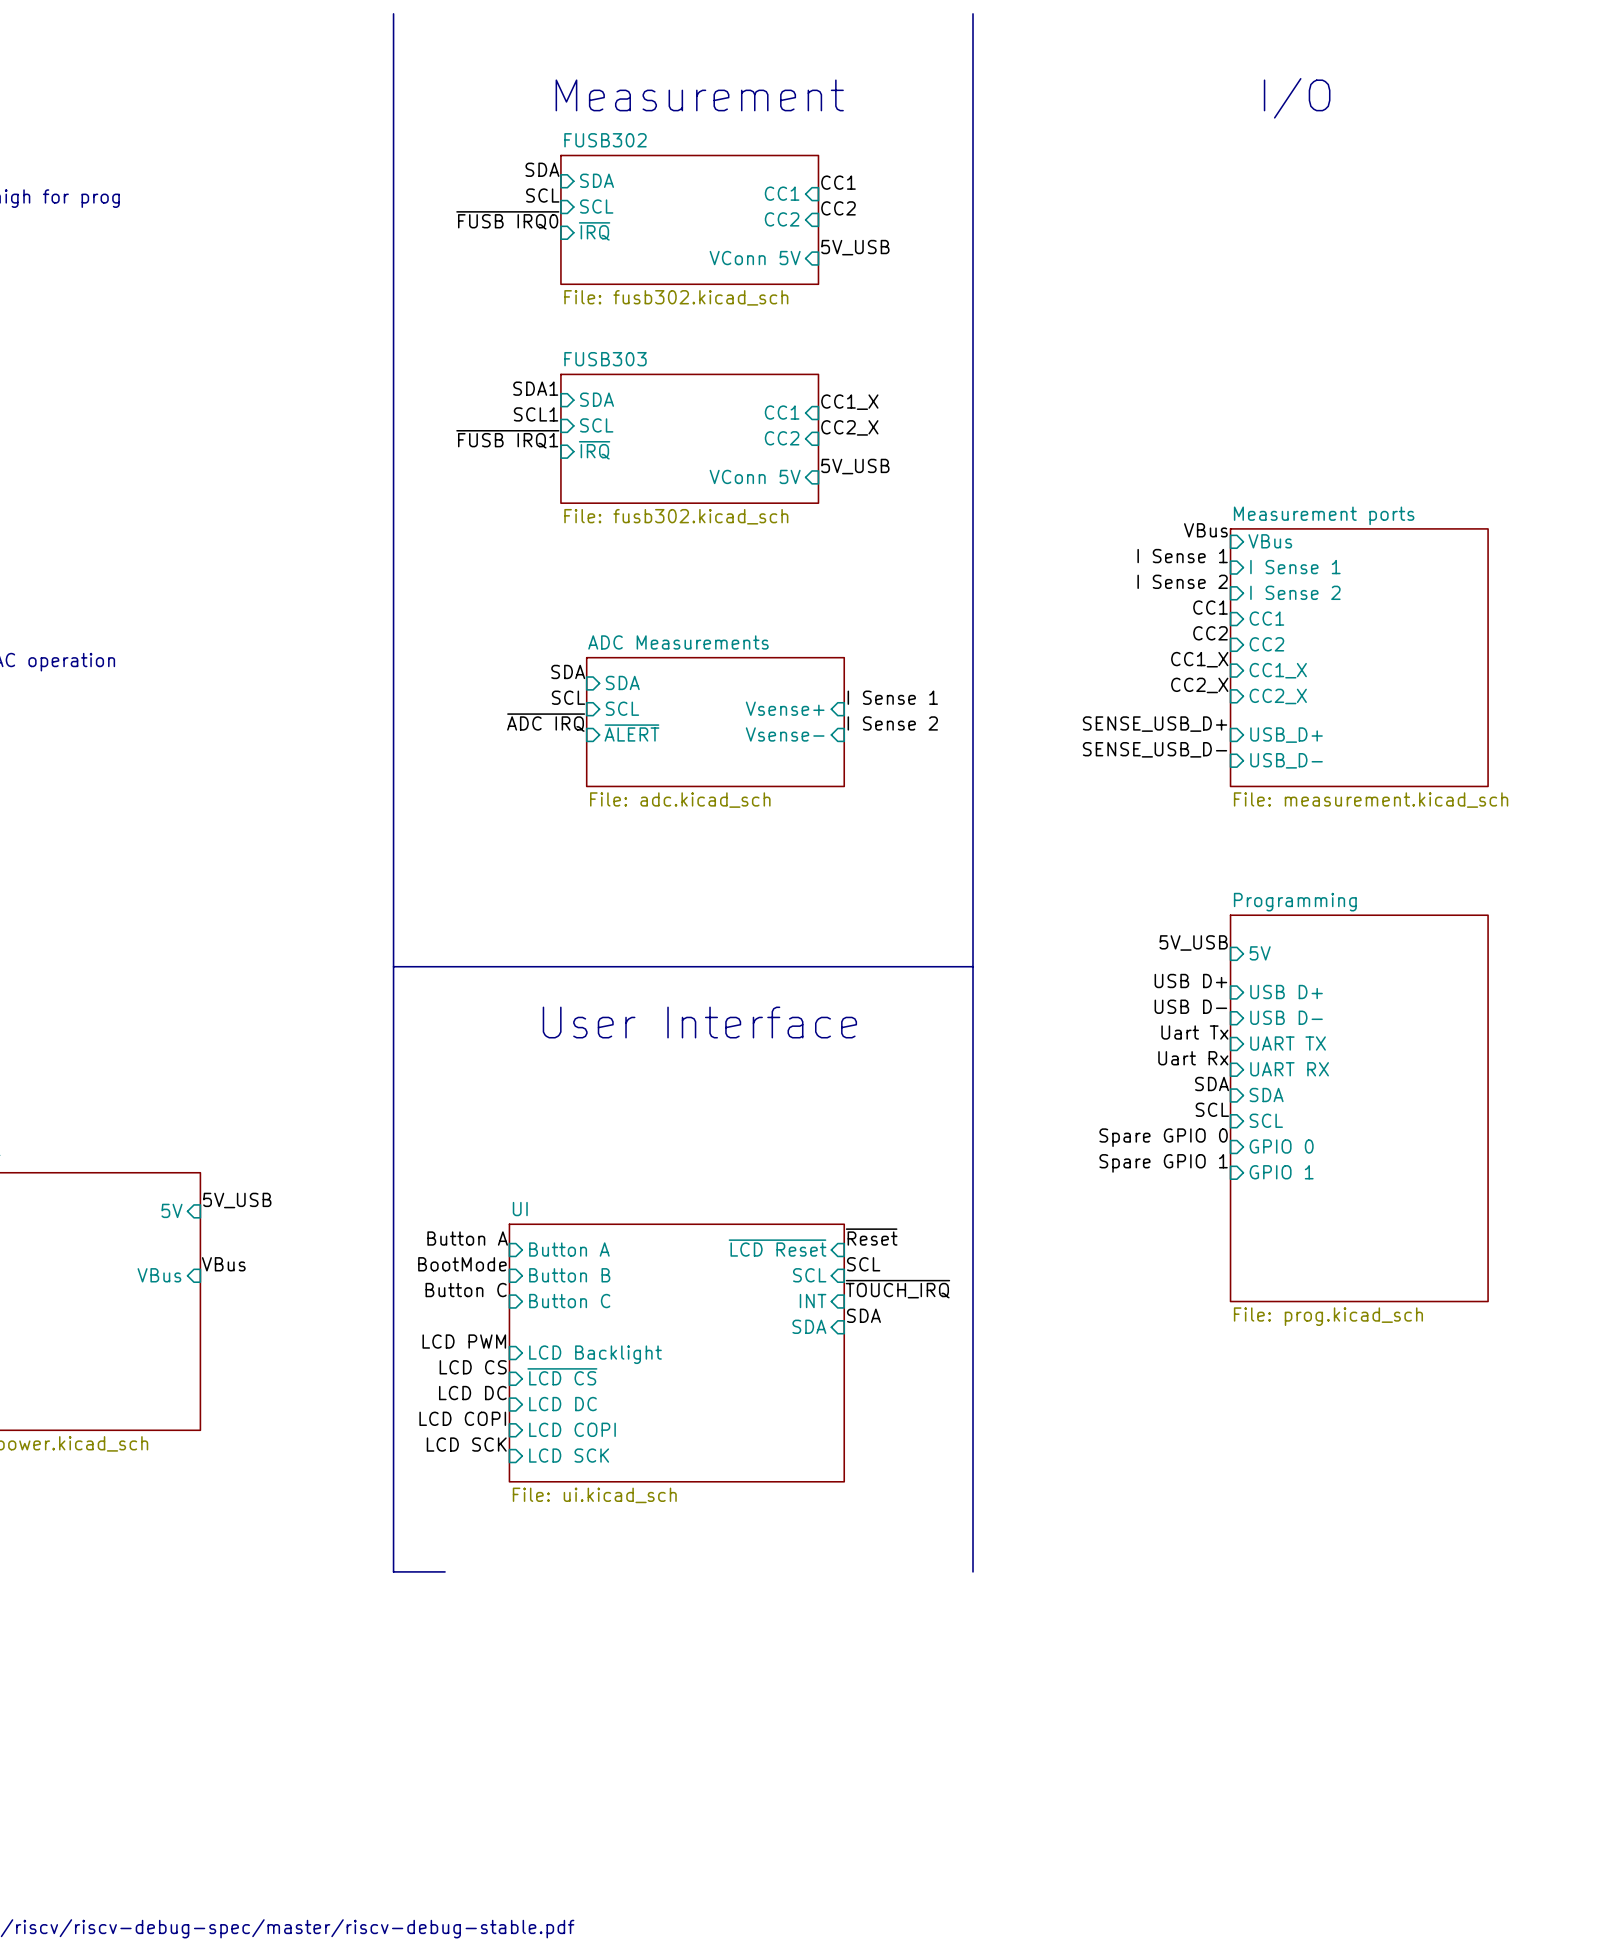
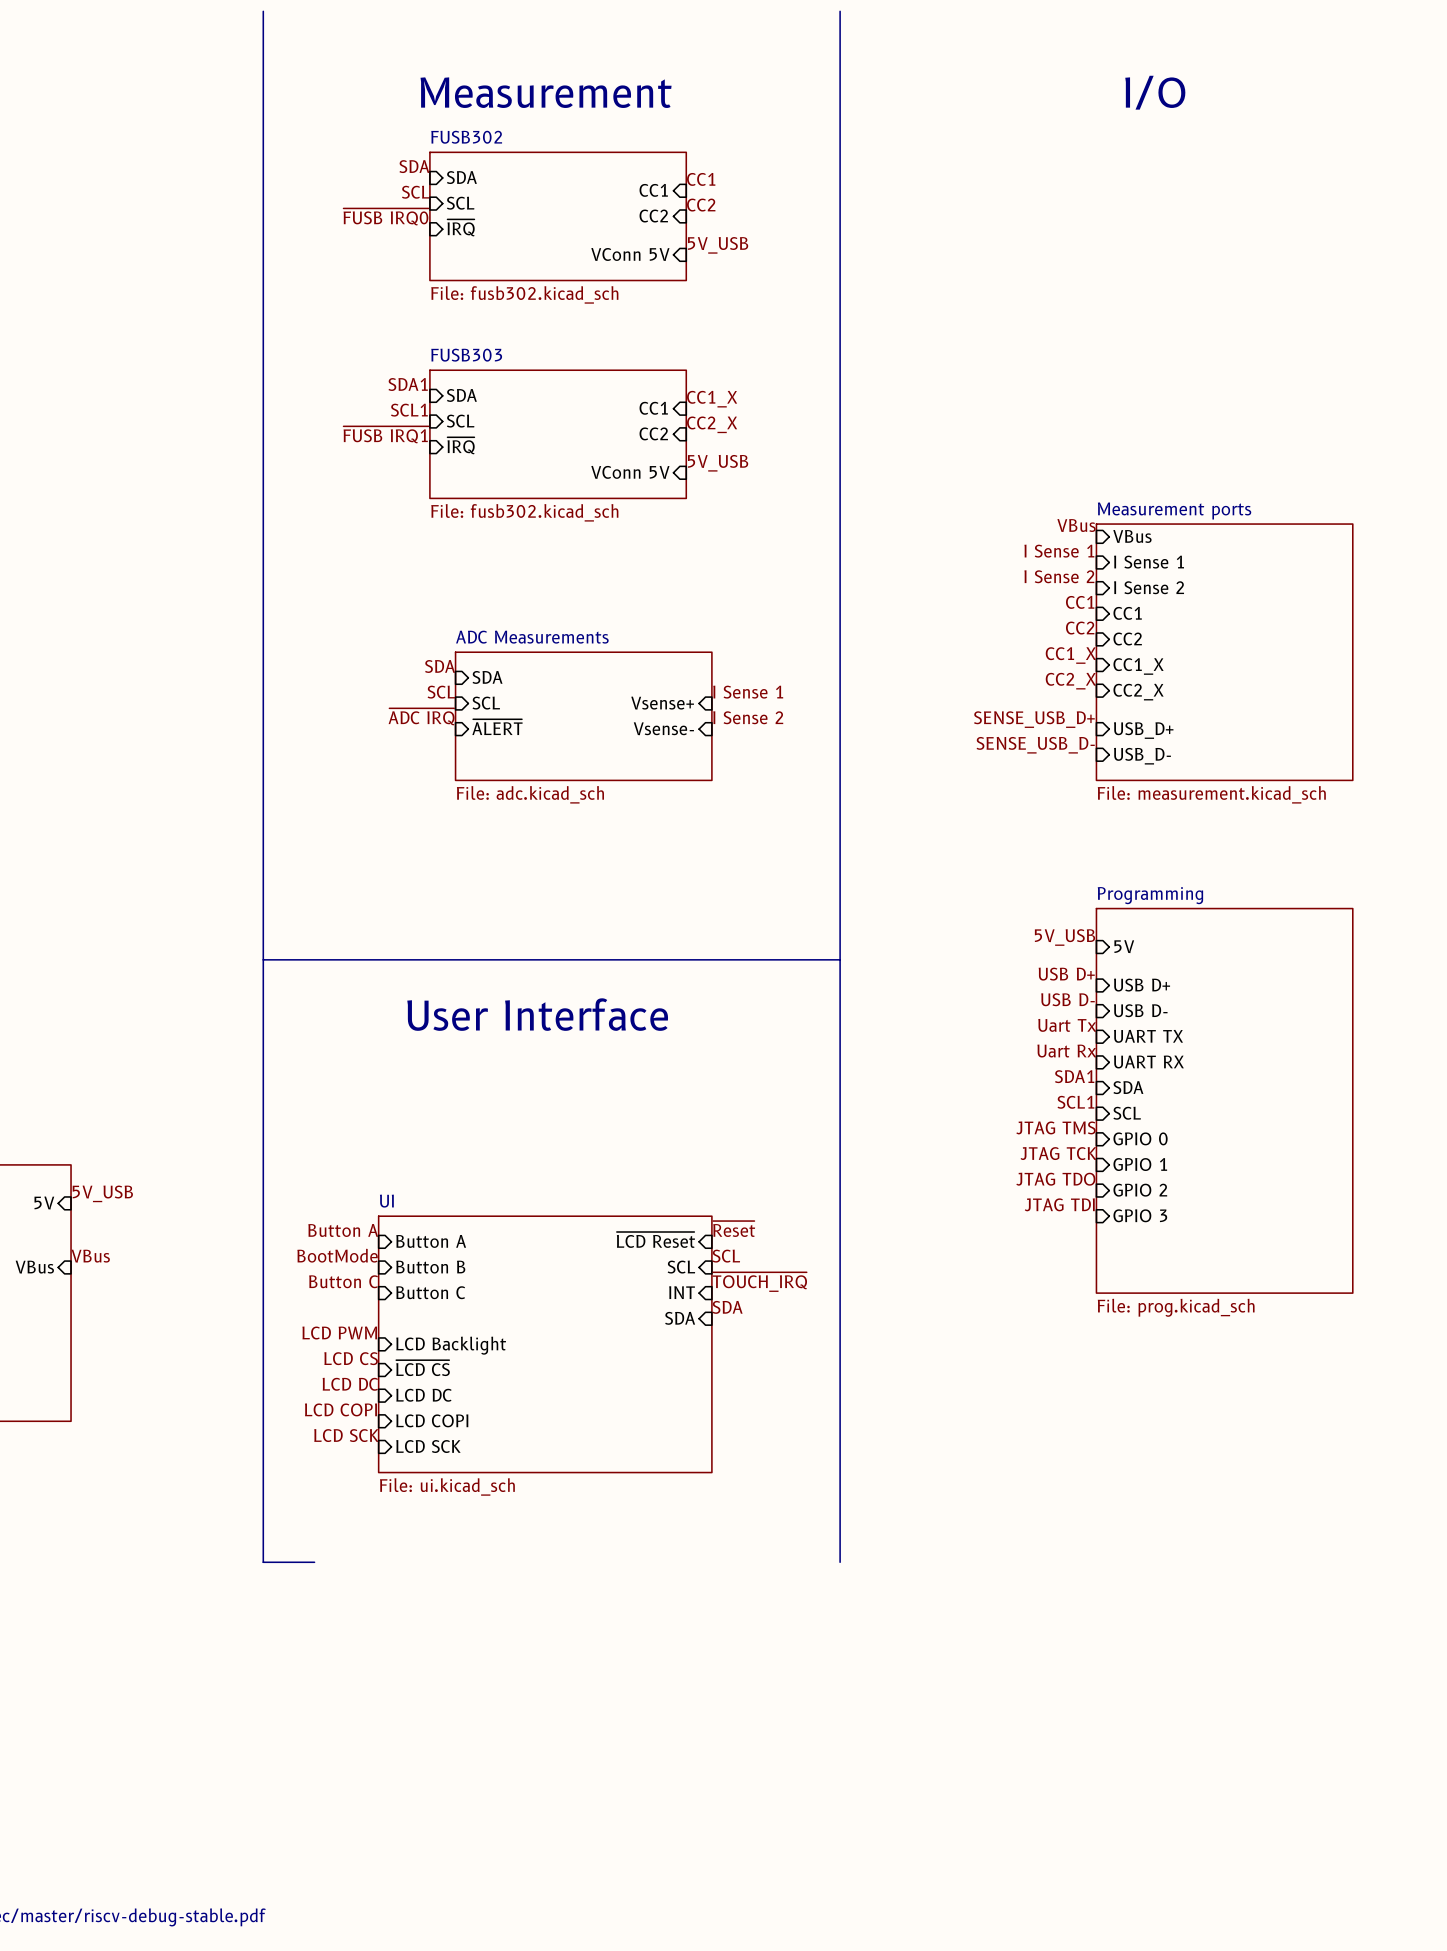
label: SDA (1212, 1084) -> SDA1 (1074, 1076)
label: SCL (1212, 1109) -> SCL1 (1075, 1102)
label: Spare GPIO 0 (1163, 1137) -> JTAG TMS (1056, 1127)
label: Spare GPIO 1 (1163, 1163) -> JTAG TCK (1058, 1153)
label: none -> JTAG TDO (1055, 1179)
sheet pin: none -> GPIO 2 (1140, 1190)
label: none -> JTAG TDI (1059, 1204)
sheet pin: none -> GPIO 3 (1140, 1215)

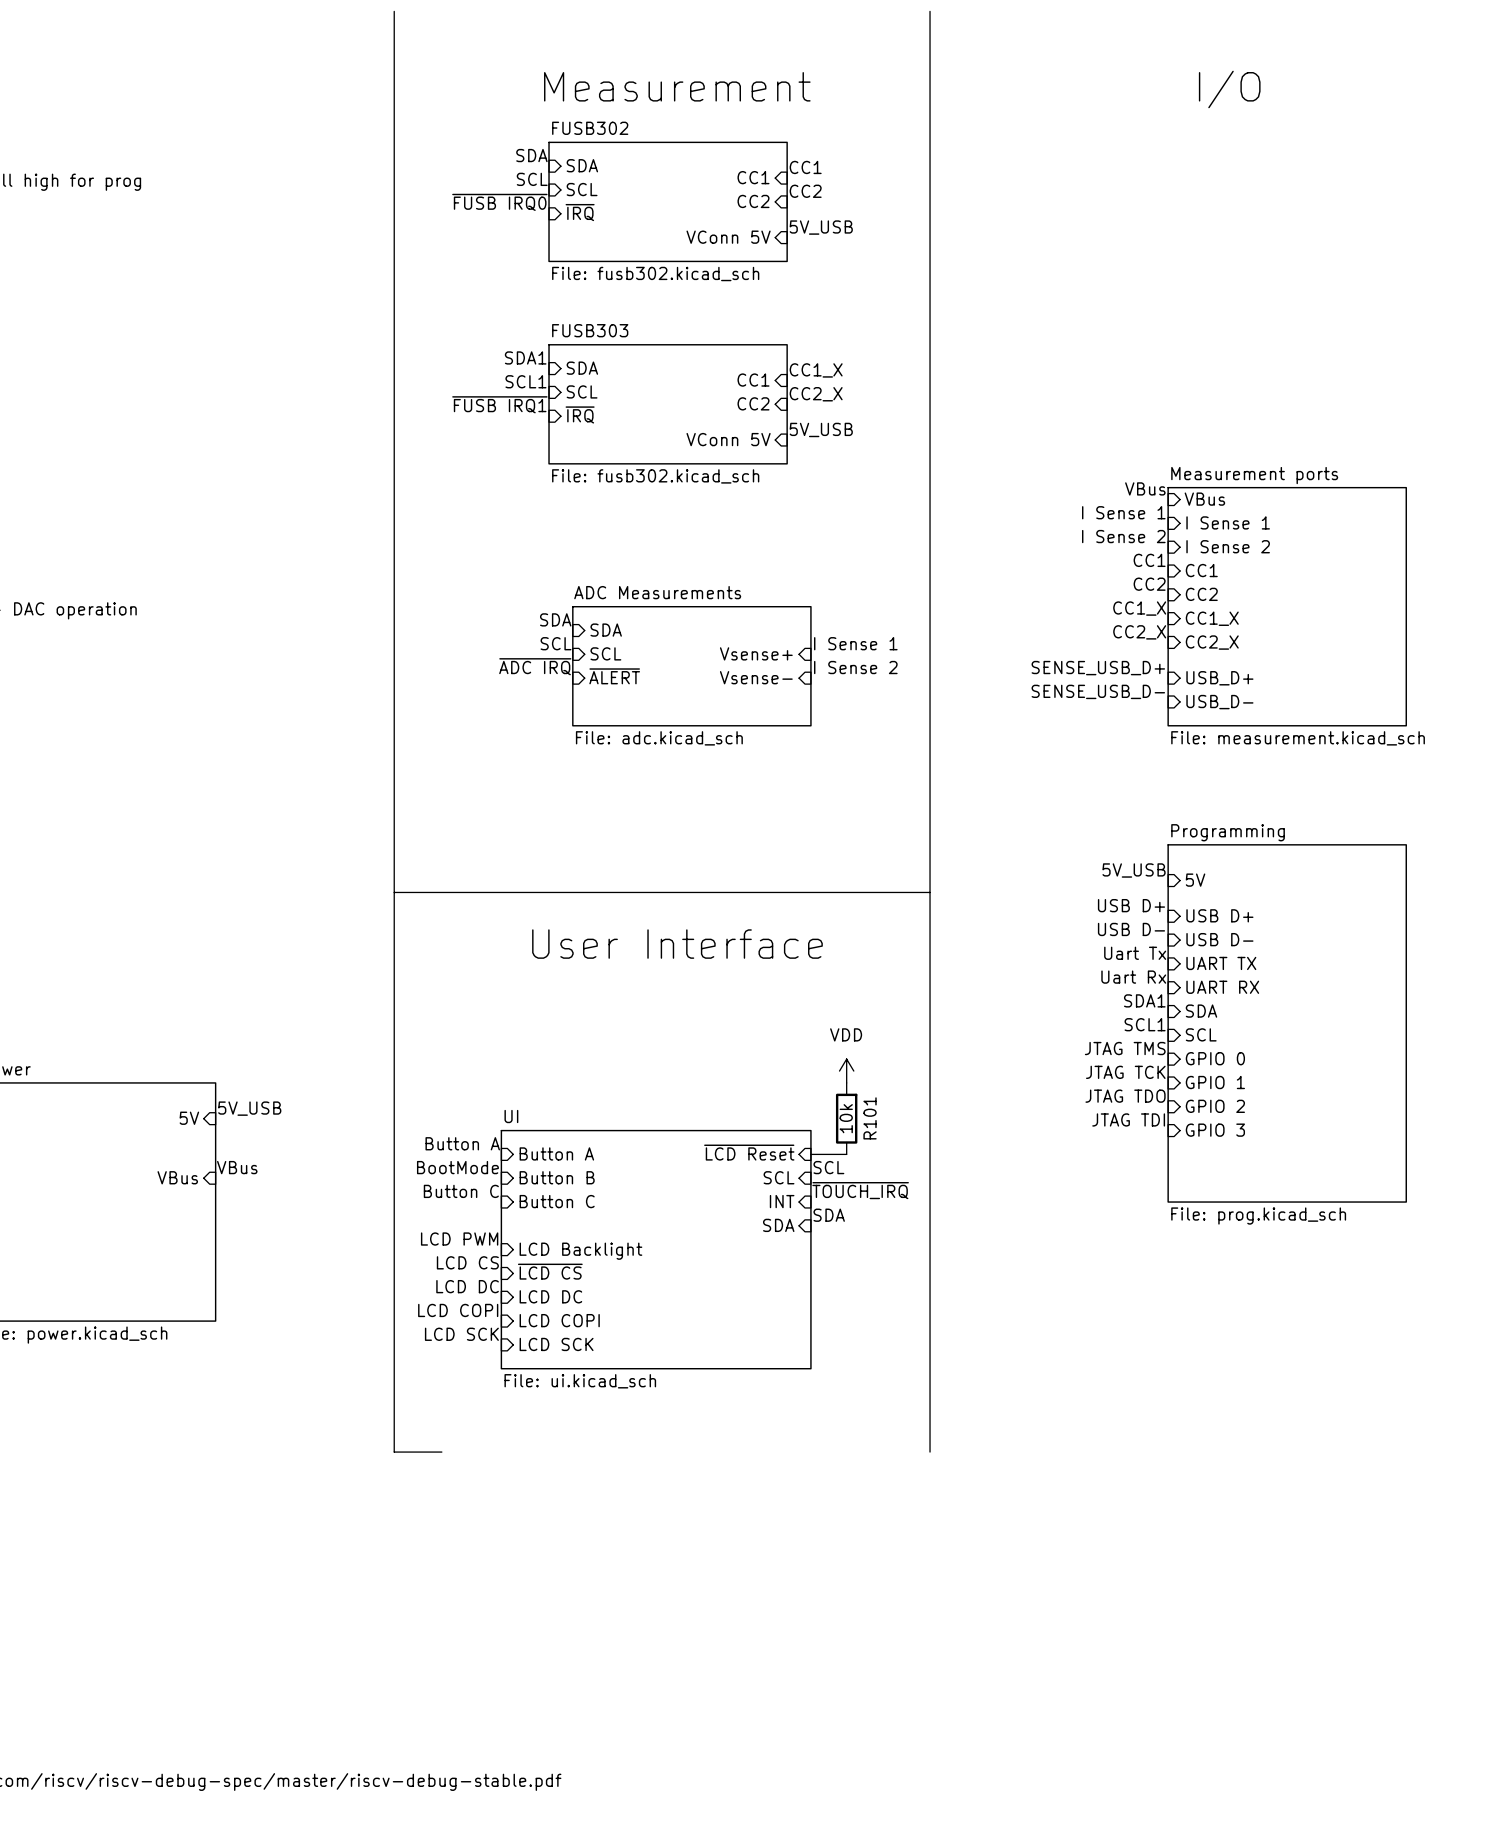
power symbol: none -> VDD (846, 1071)
R101: none -> 10k (846, 1118)
label: ~{Reset} (734, 1228) -> none
wire: none -> (810, 1154) (846, 1154)

